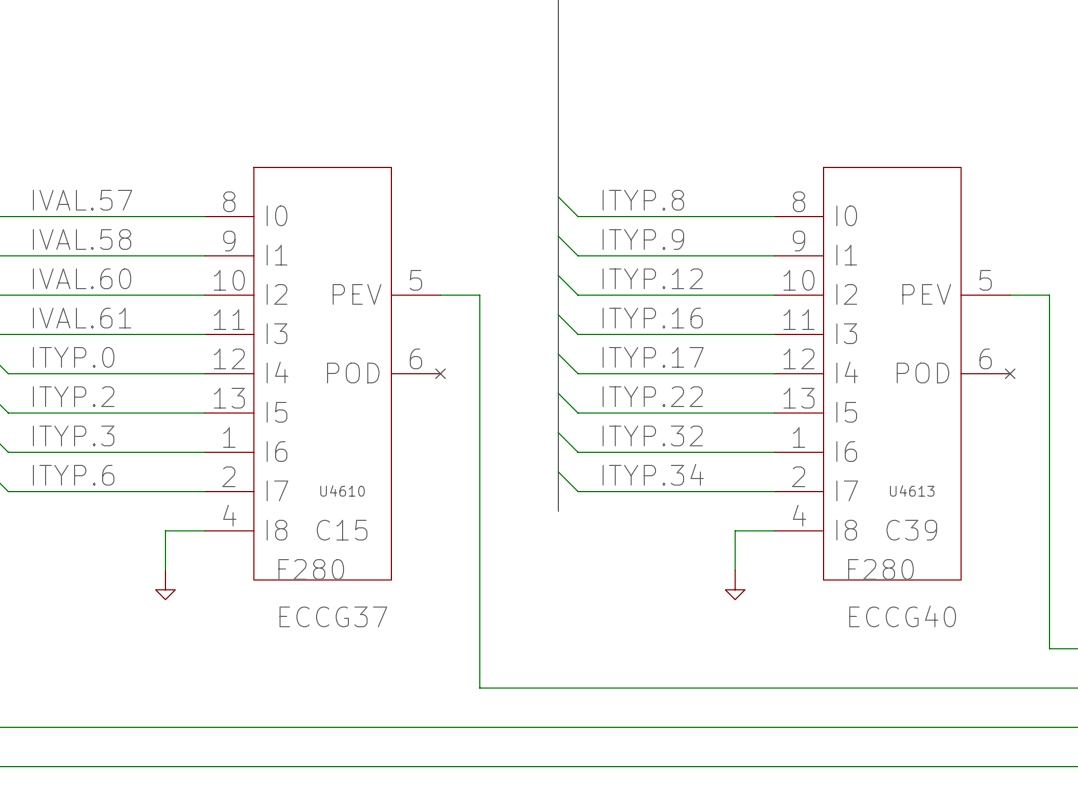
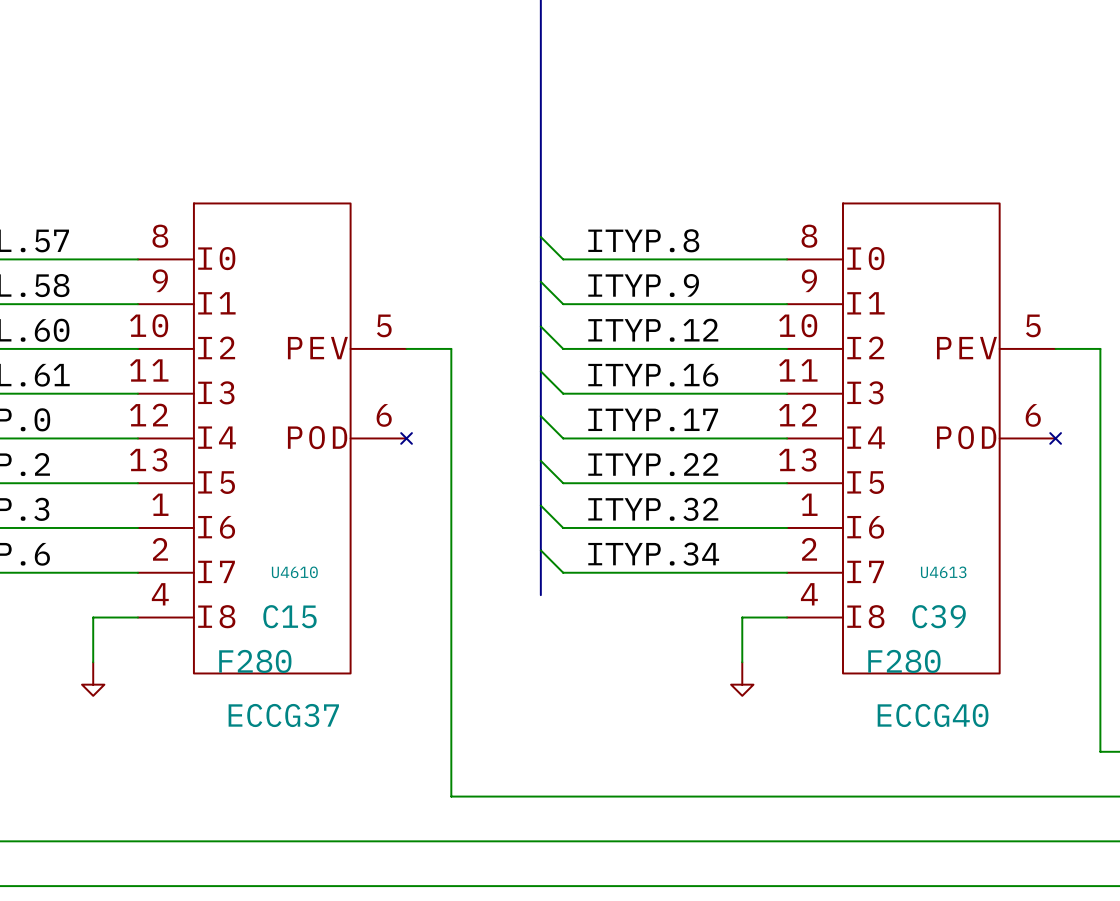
U4610 symbol: [204, 167, 441, 581] -> [137, 203, 407, 674]
U4613 symbol: [774, 167, 1011, 581] -> [787, 203, 1056, 674]

